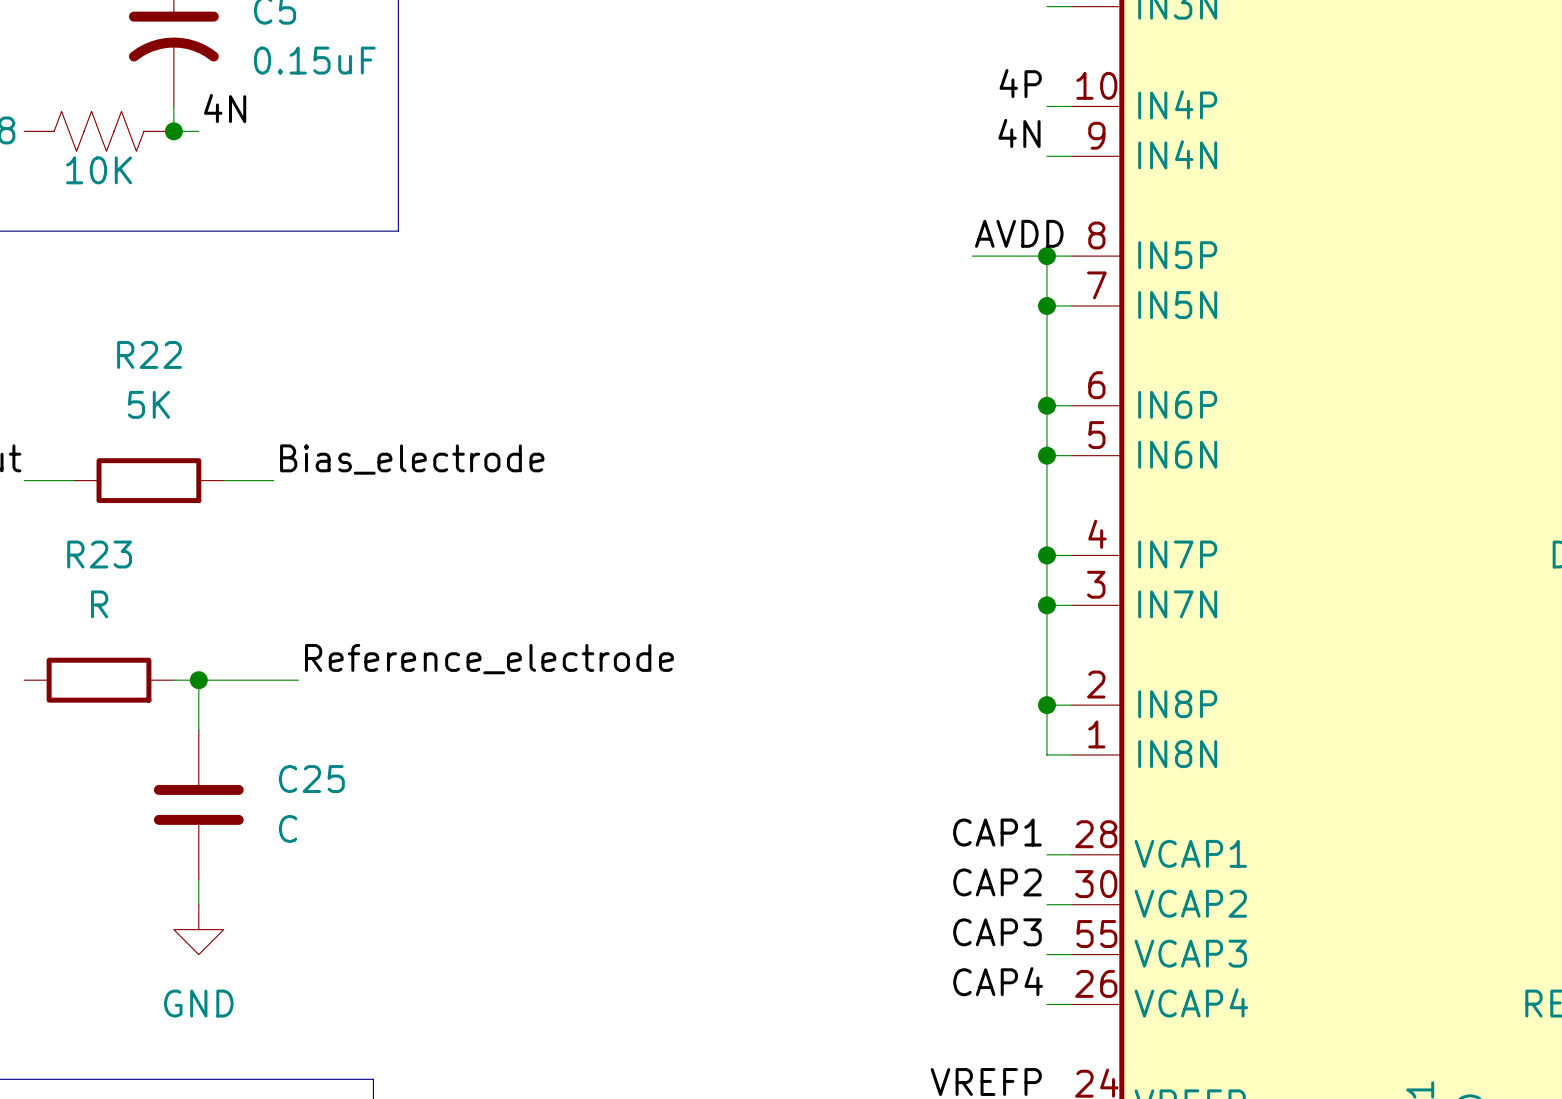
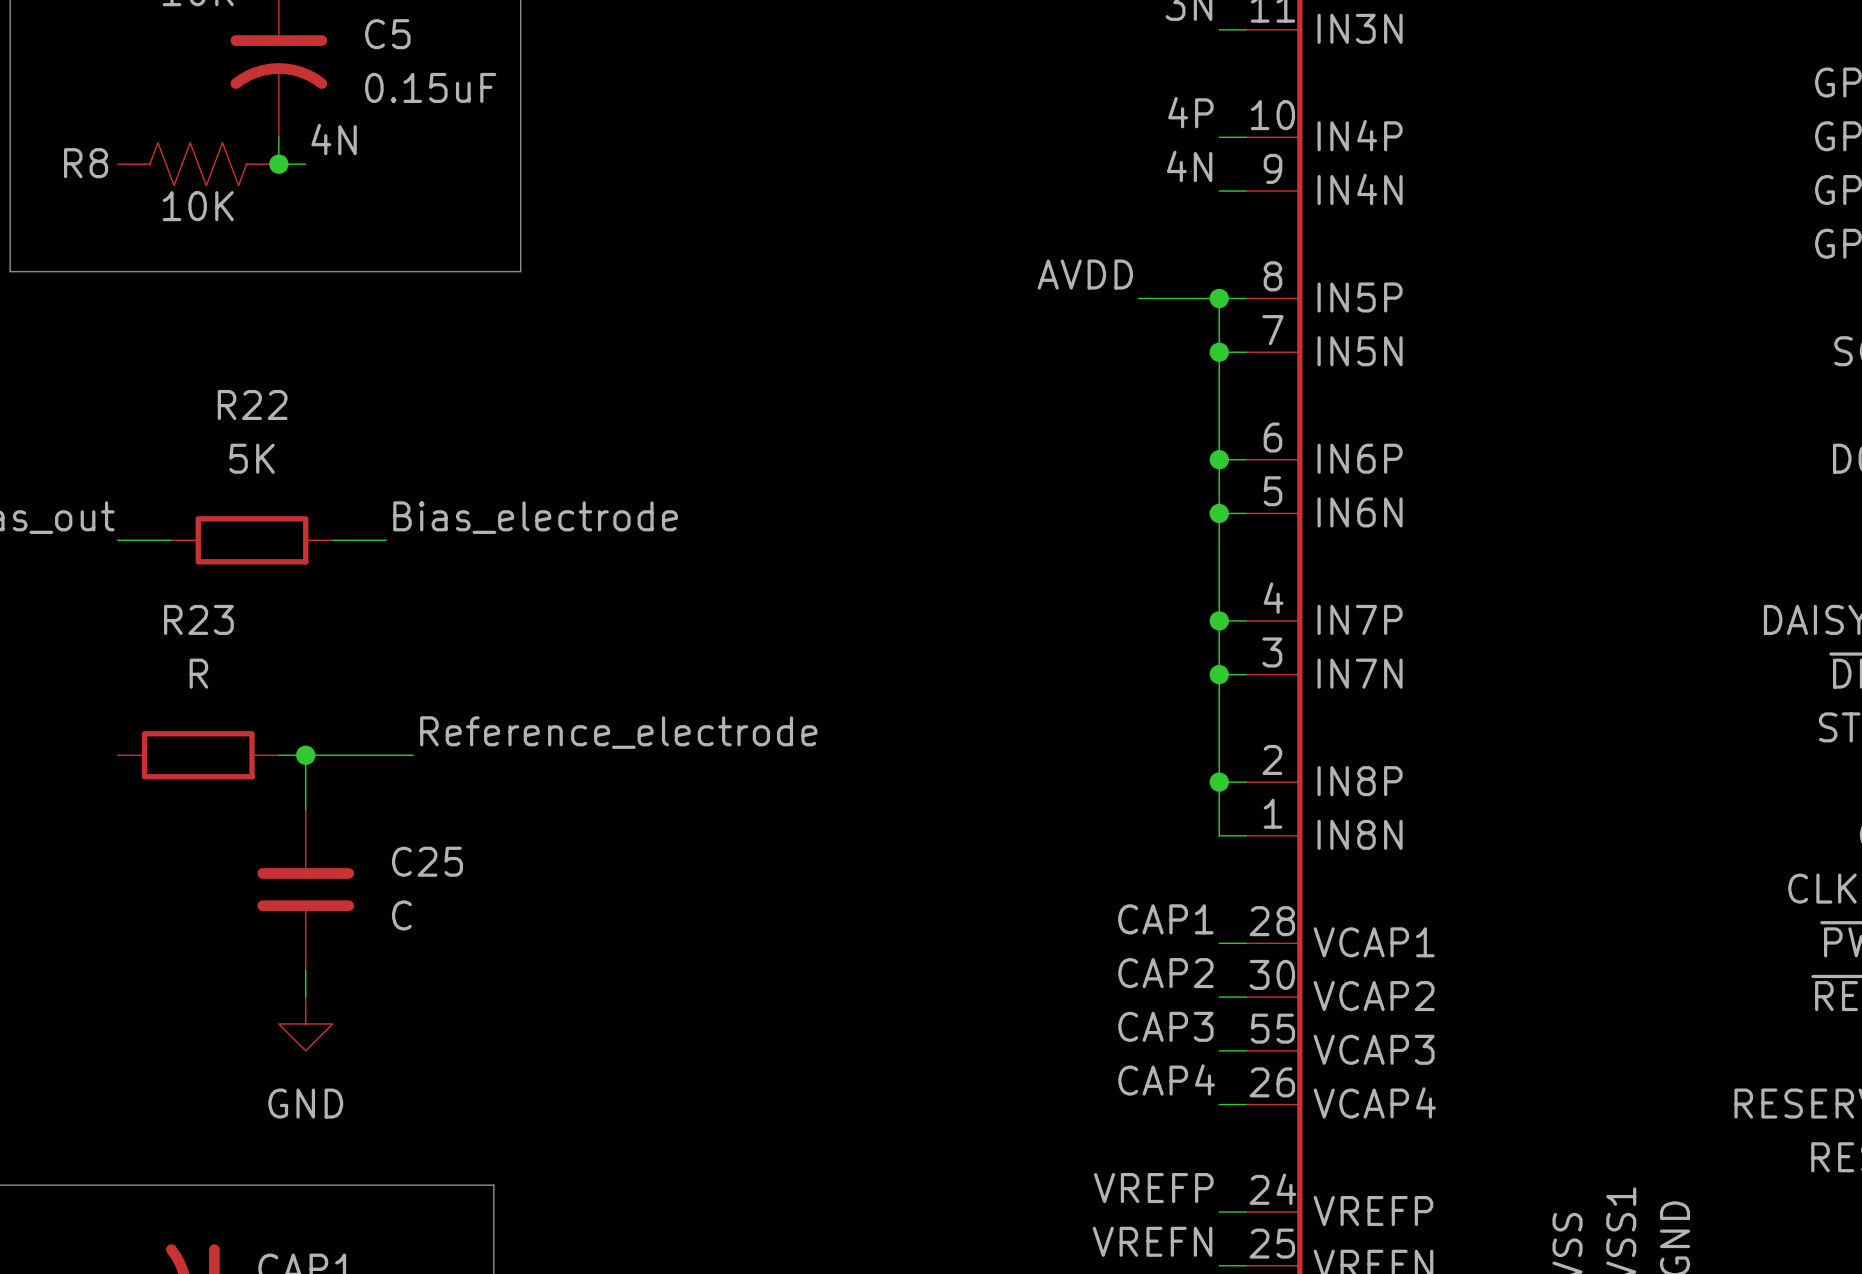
label position: AVDD (1019, 233) -> AVDD (1085, 274)

